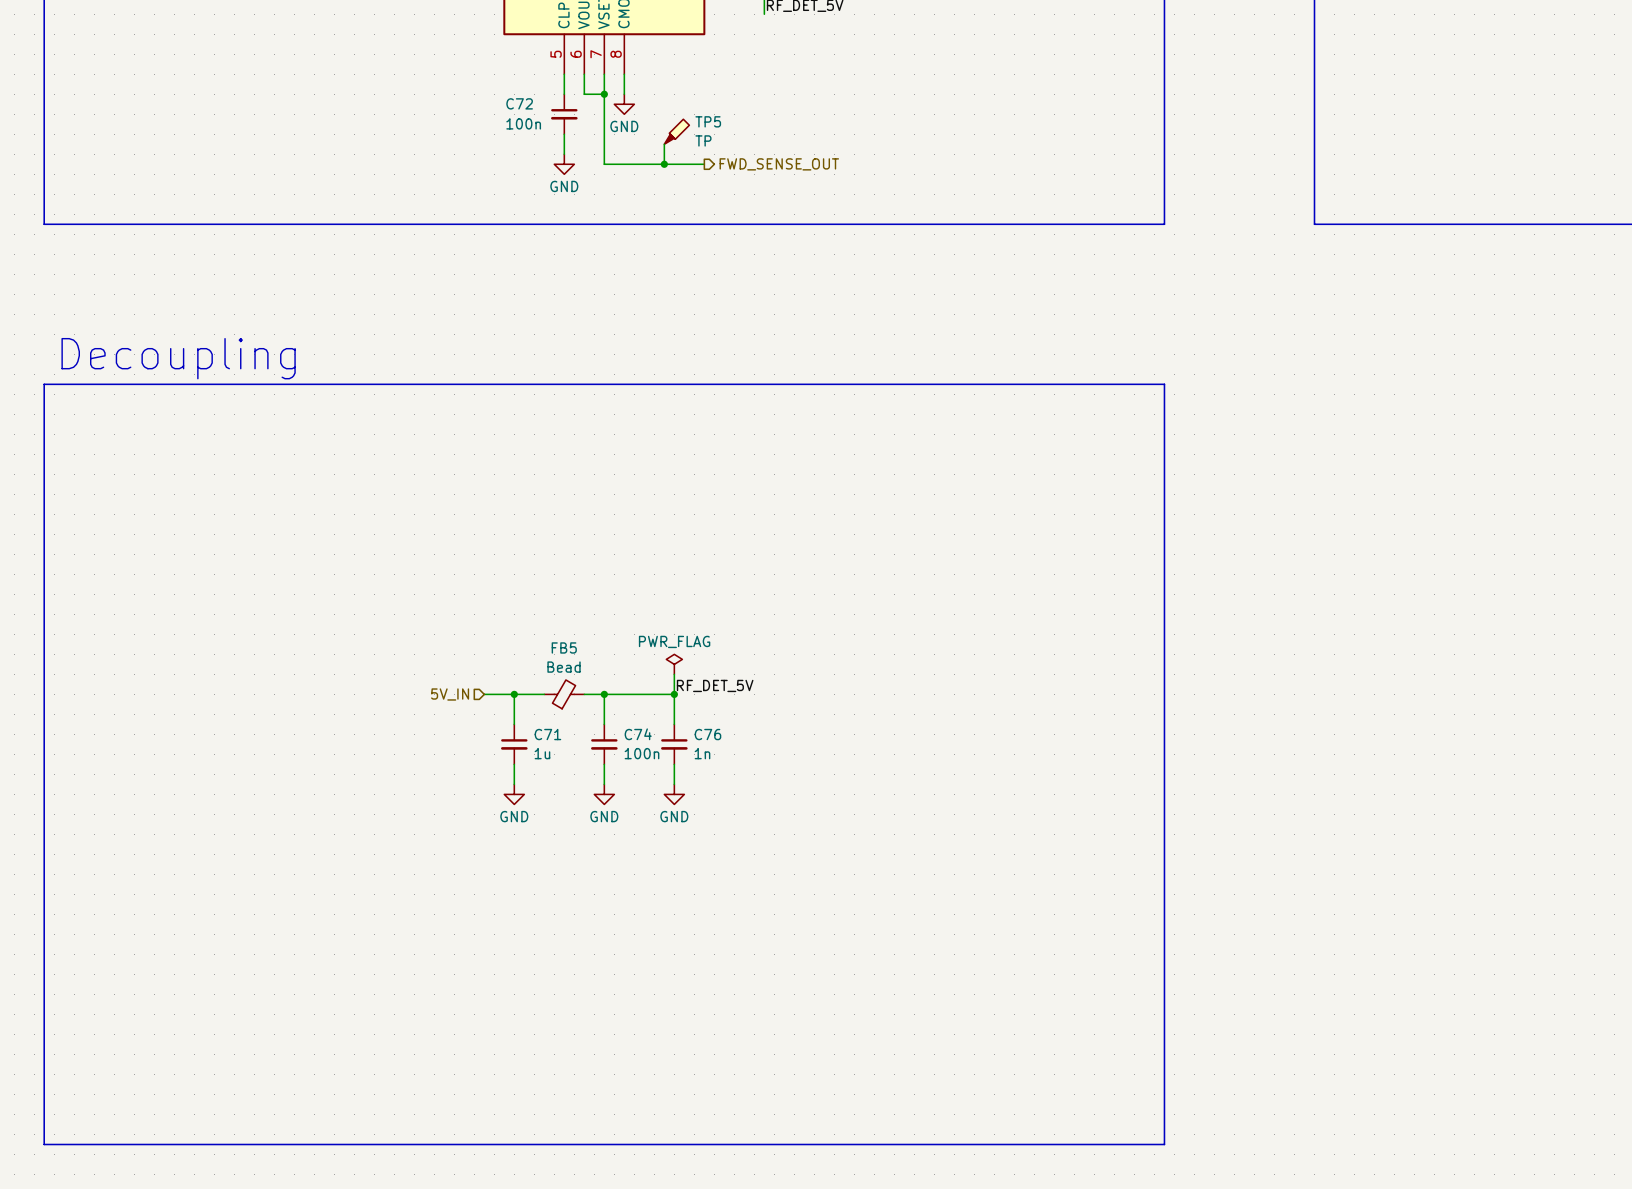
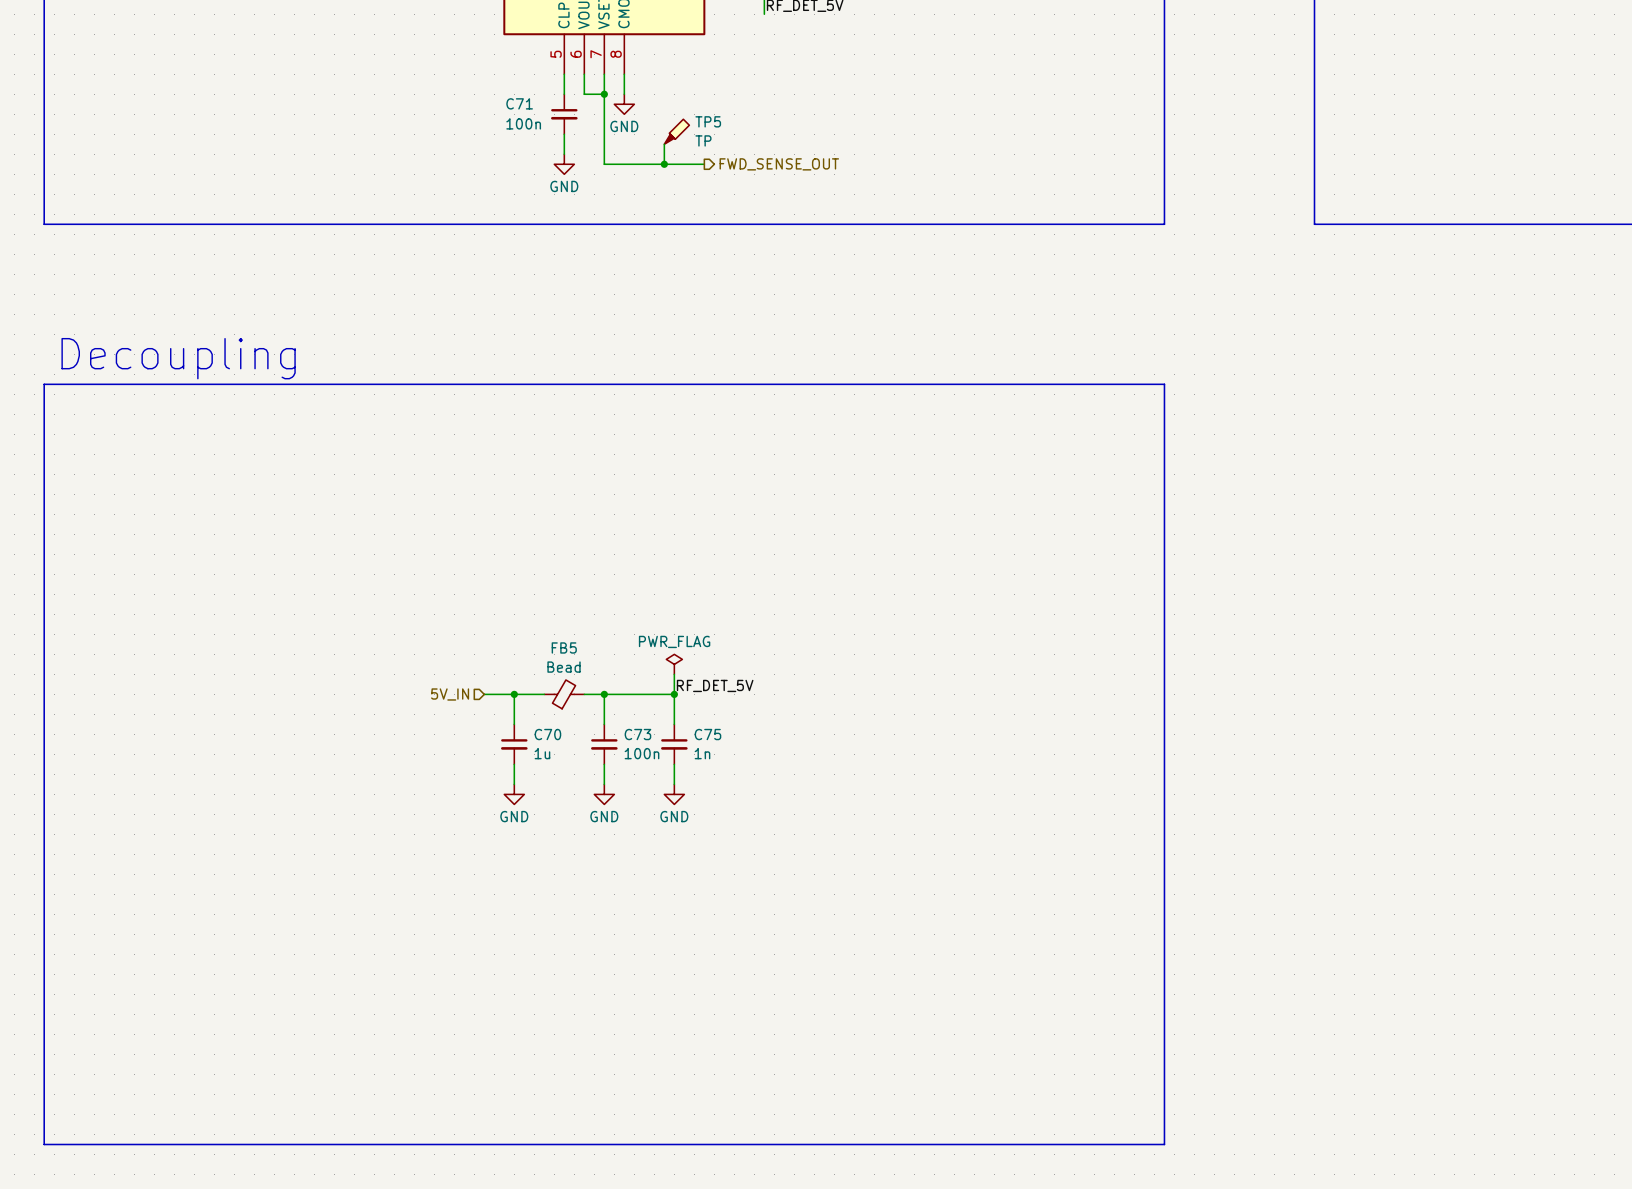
C72 name: C72 (519, 103) -> C71 (519, 103)
C71 name: C71 (547, 734) -> C70 (547, 734)
C74 name: C74 (638, 734) -> C73 (637, 734)
C76 name: C76 (707, 734) -> C75 (707, 734)

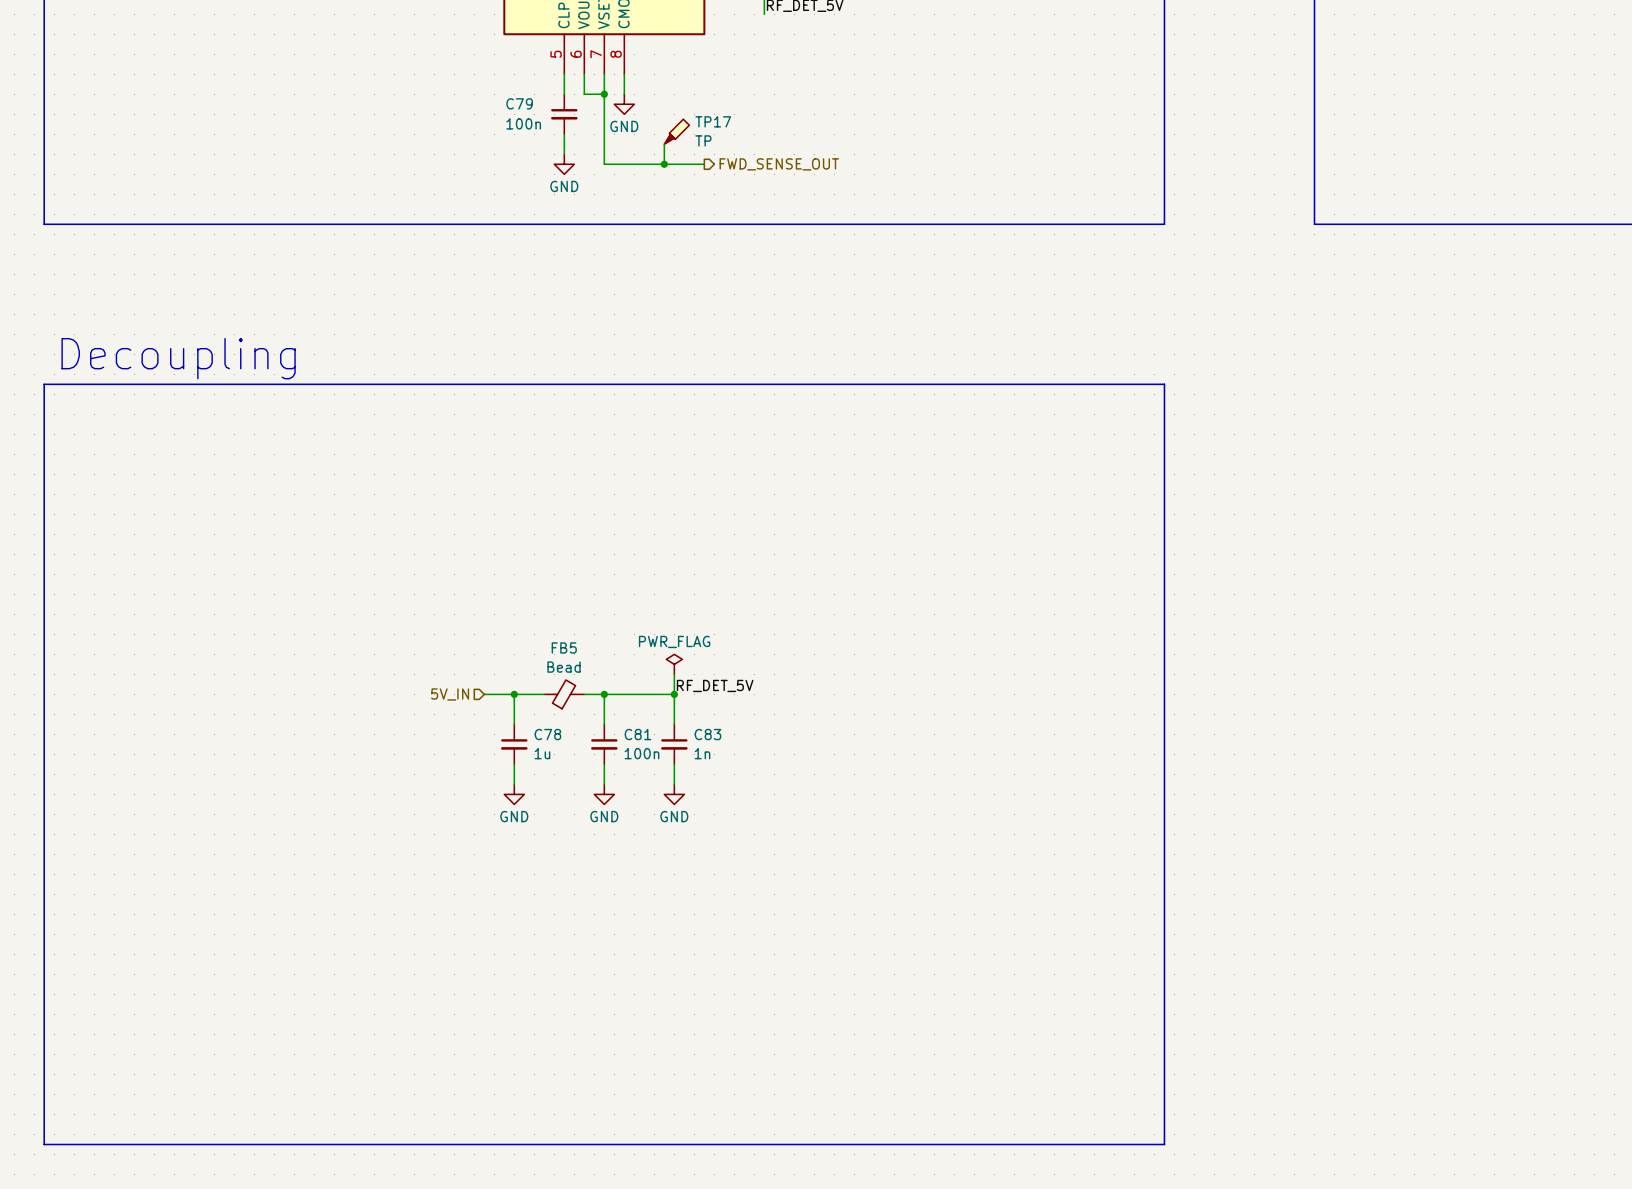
C71 name: C71 (519, 103) -> C79 (519, 103)
TP5 name: TP5 (708, 121) -> TP17 (713, 121)
C70 name: C70 (547, 734) -> C78 (547, 734)
C73 name: C73 (637, 734) -> C81 (637, 734)
C75 name: C75 (707, 734) -> C83 (707, 734)

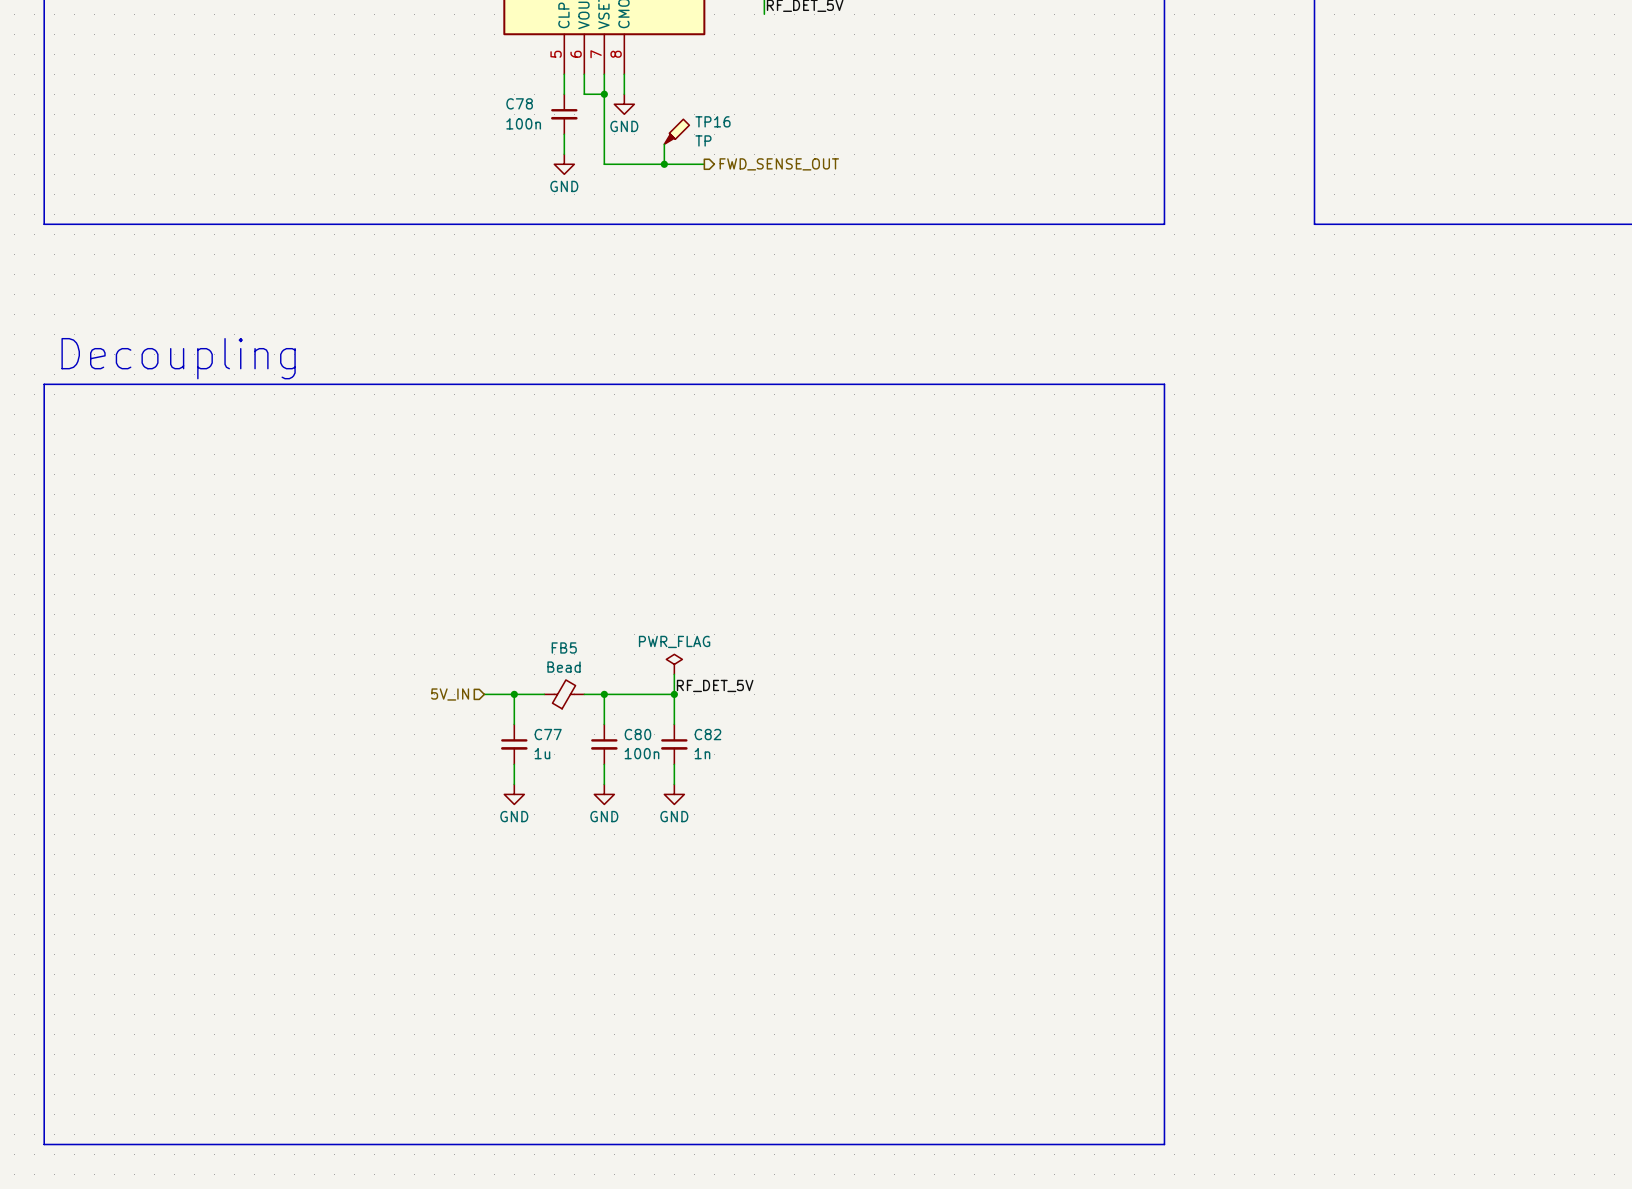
C79 name: C79 (519, 103) -> C78 (519, 103)
TP17 name: TP17 (713, 121) -> TP16 (713, 121)
C78 name: C78 (547, 734) -> C77 (548, 734)
C81 name: C81 (637, 734) -> C80 (637, 734)
C83 name: C83 (707, 734) -> C82 (707, 734)

